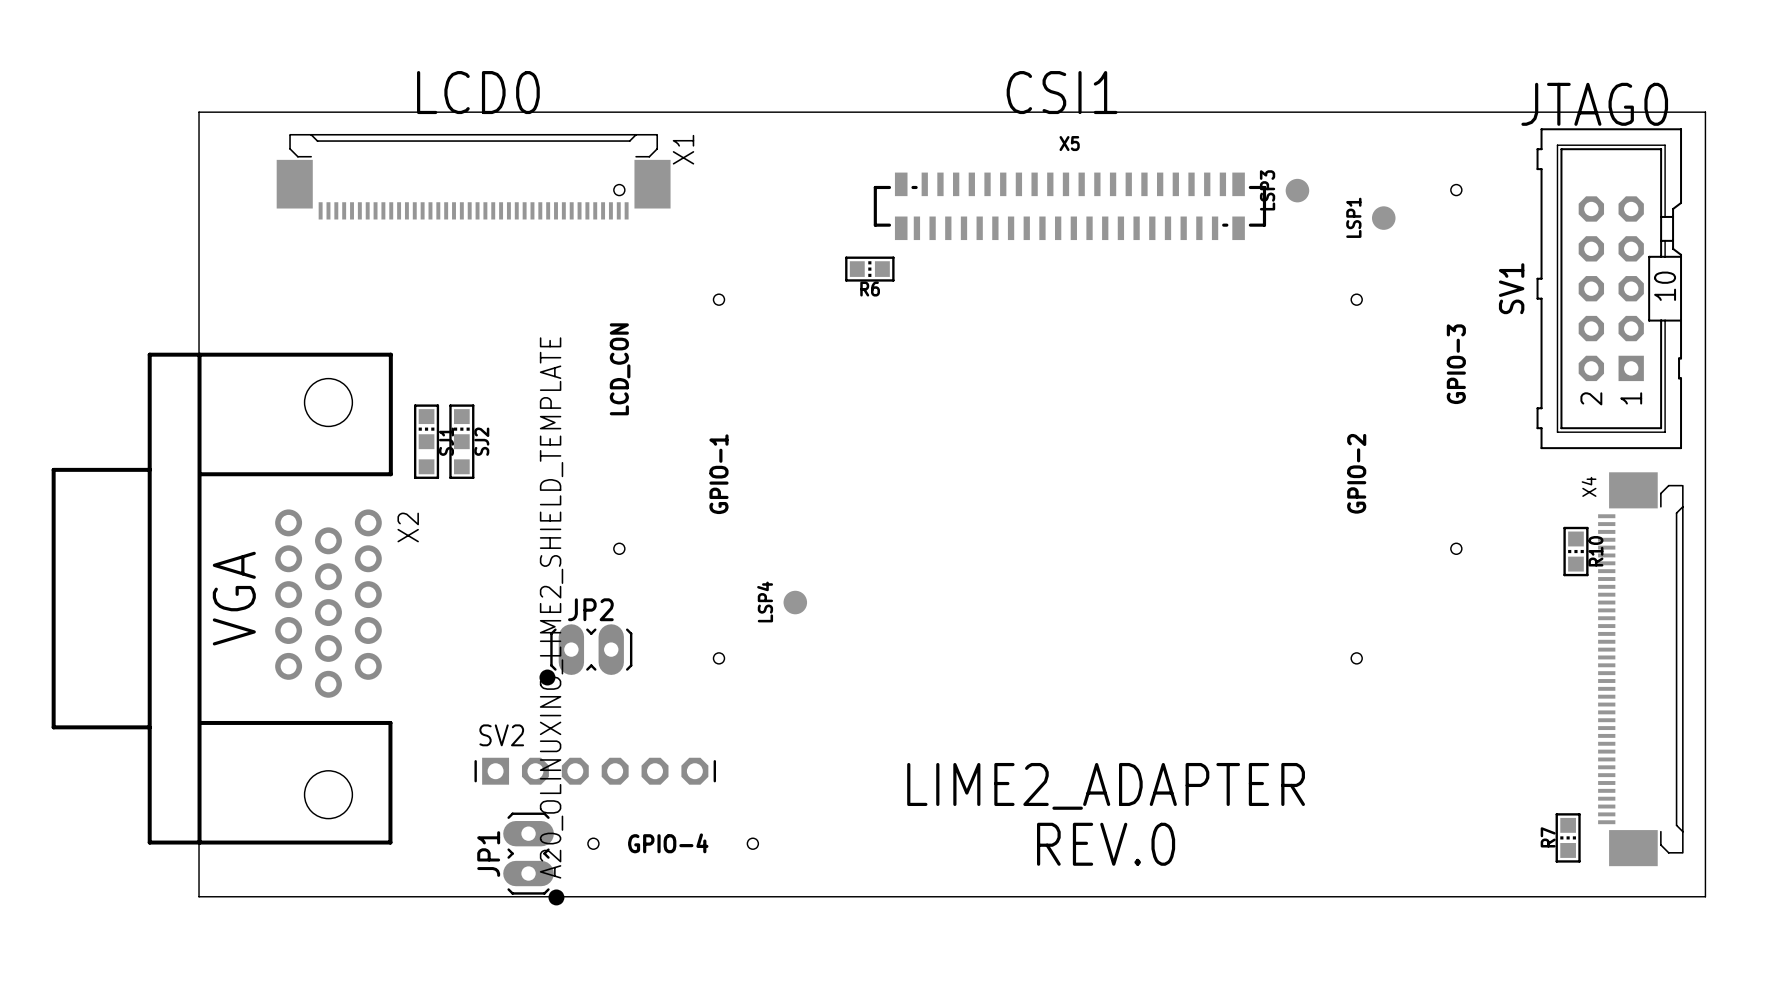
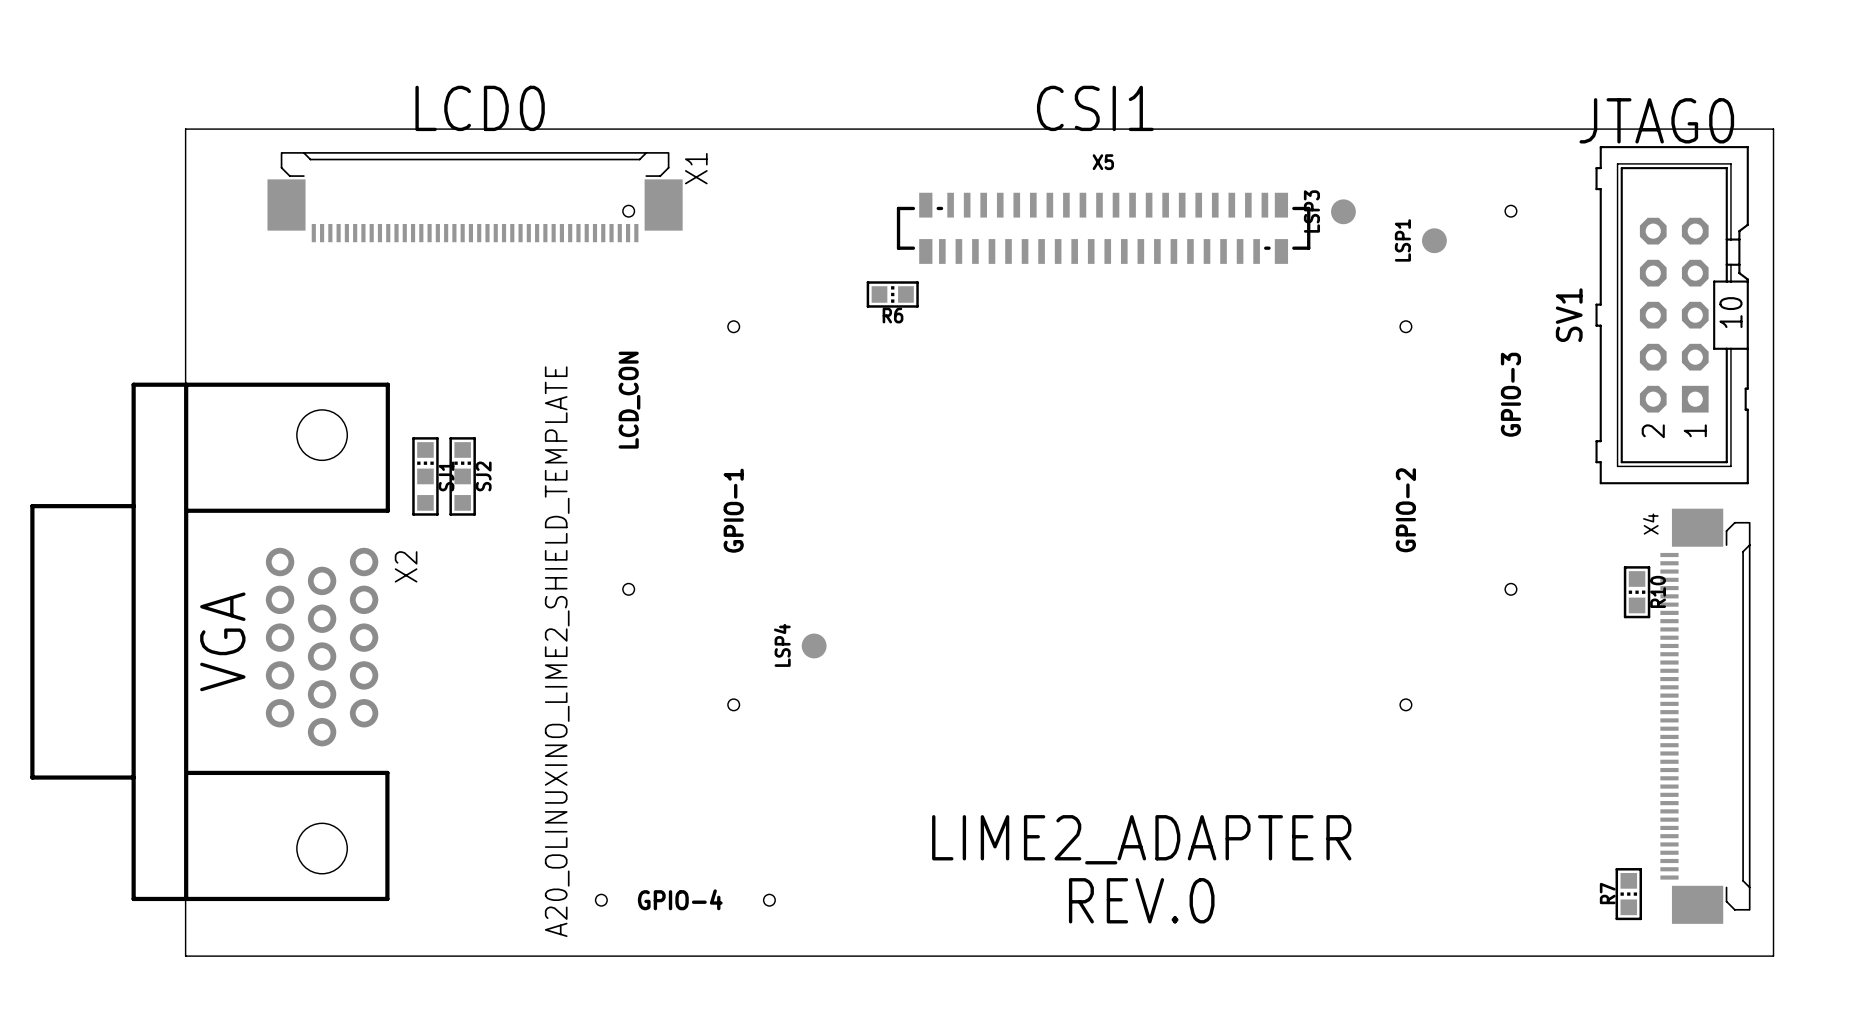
JP2: (585, 654) -> none
SV2: (595, 771) -> none
JP1: (533, 858) -> none

